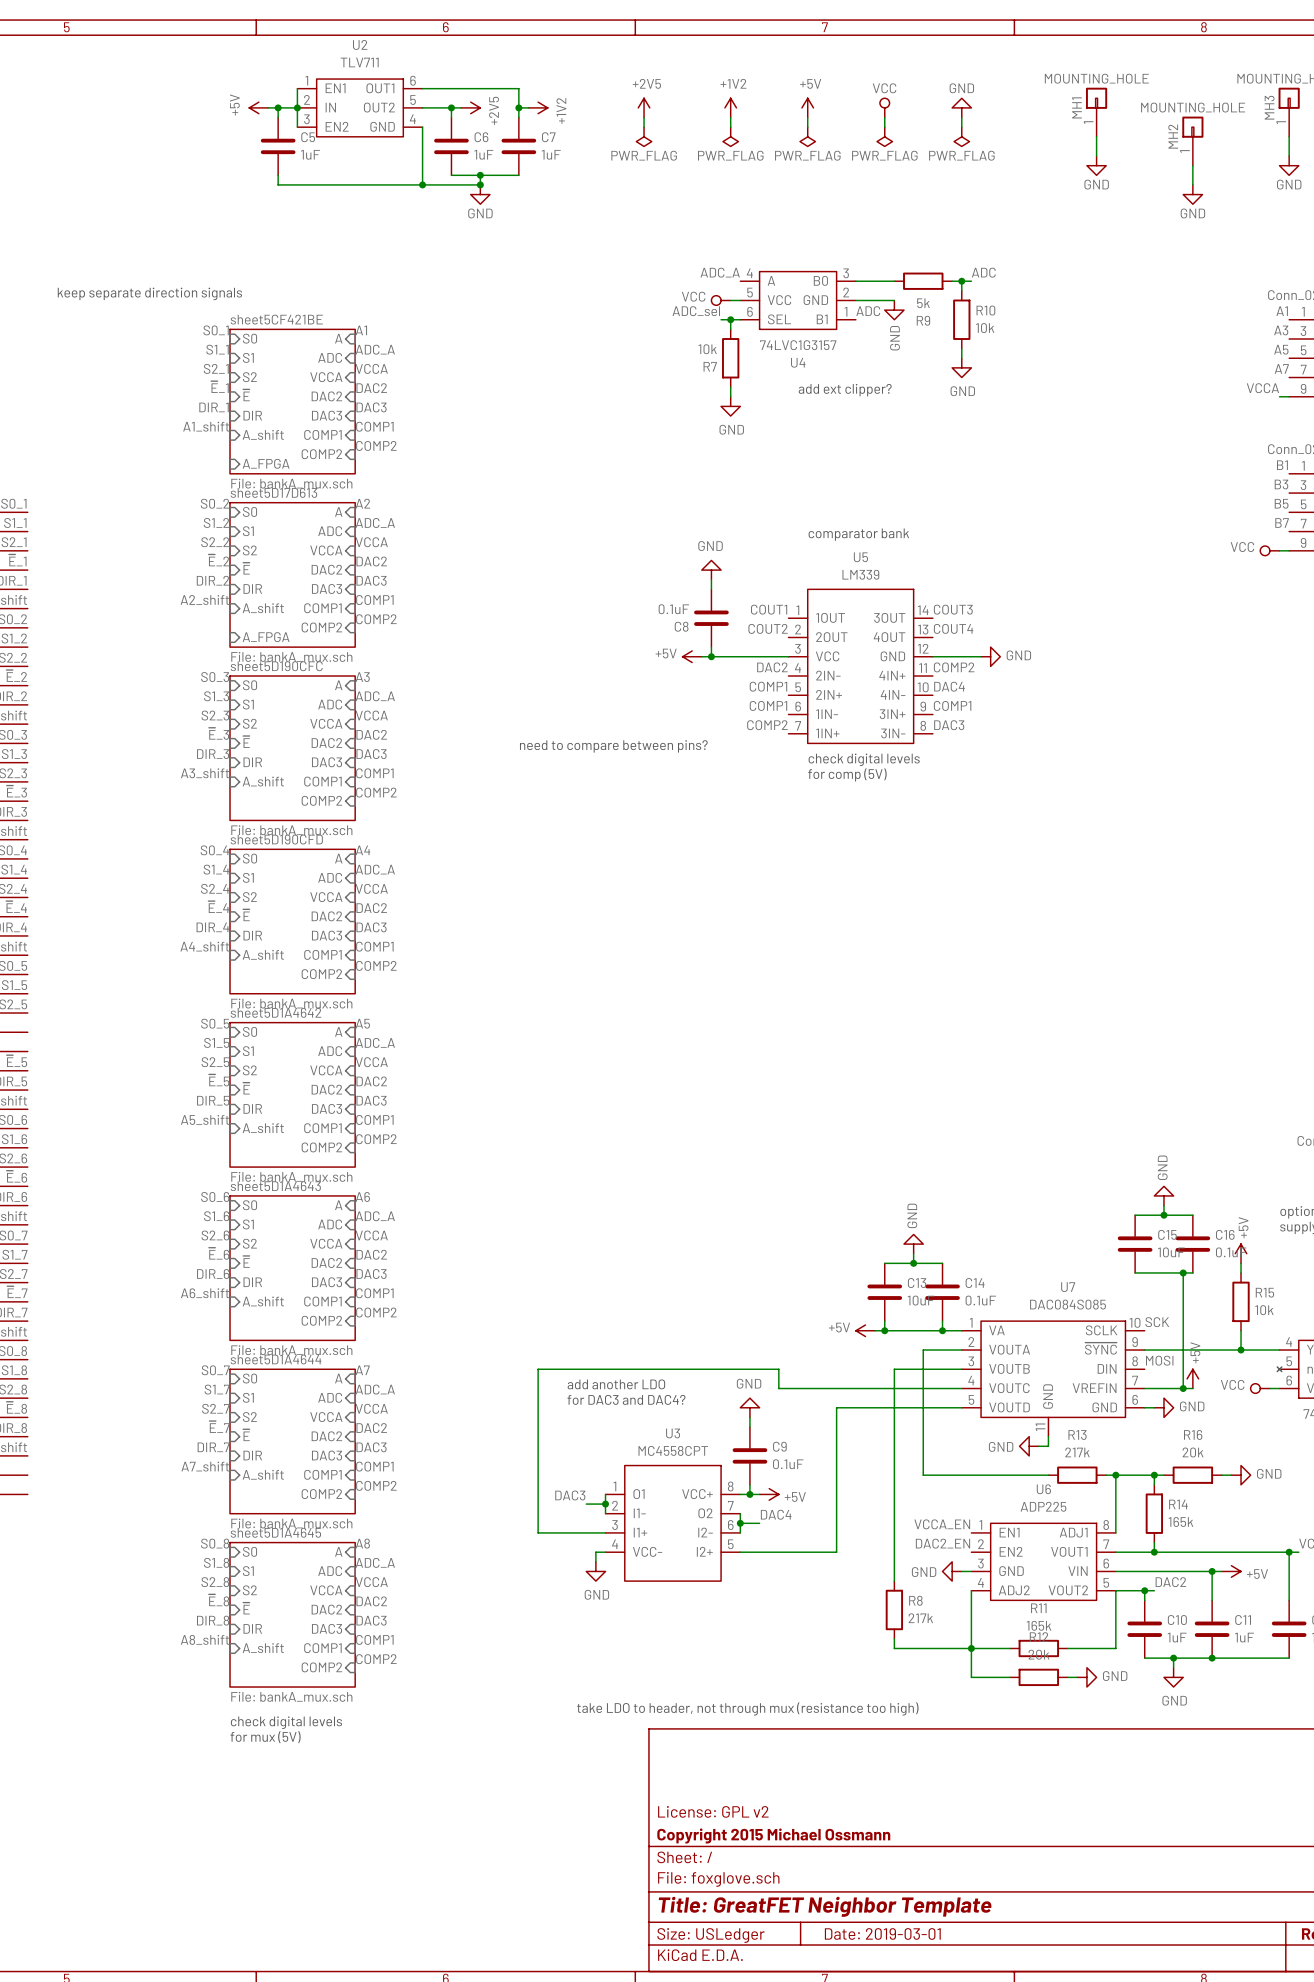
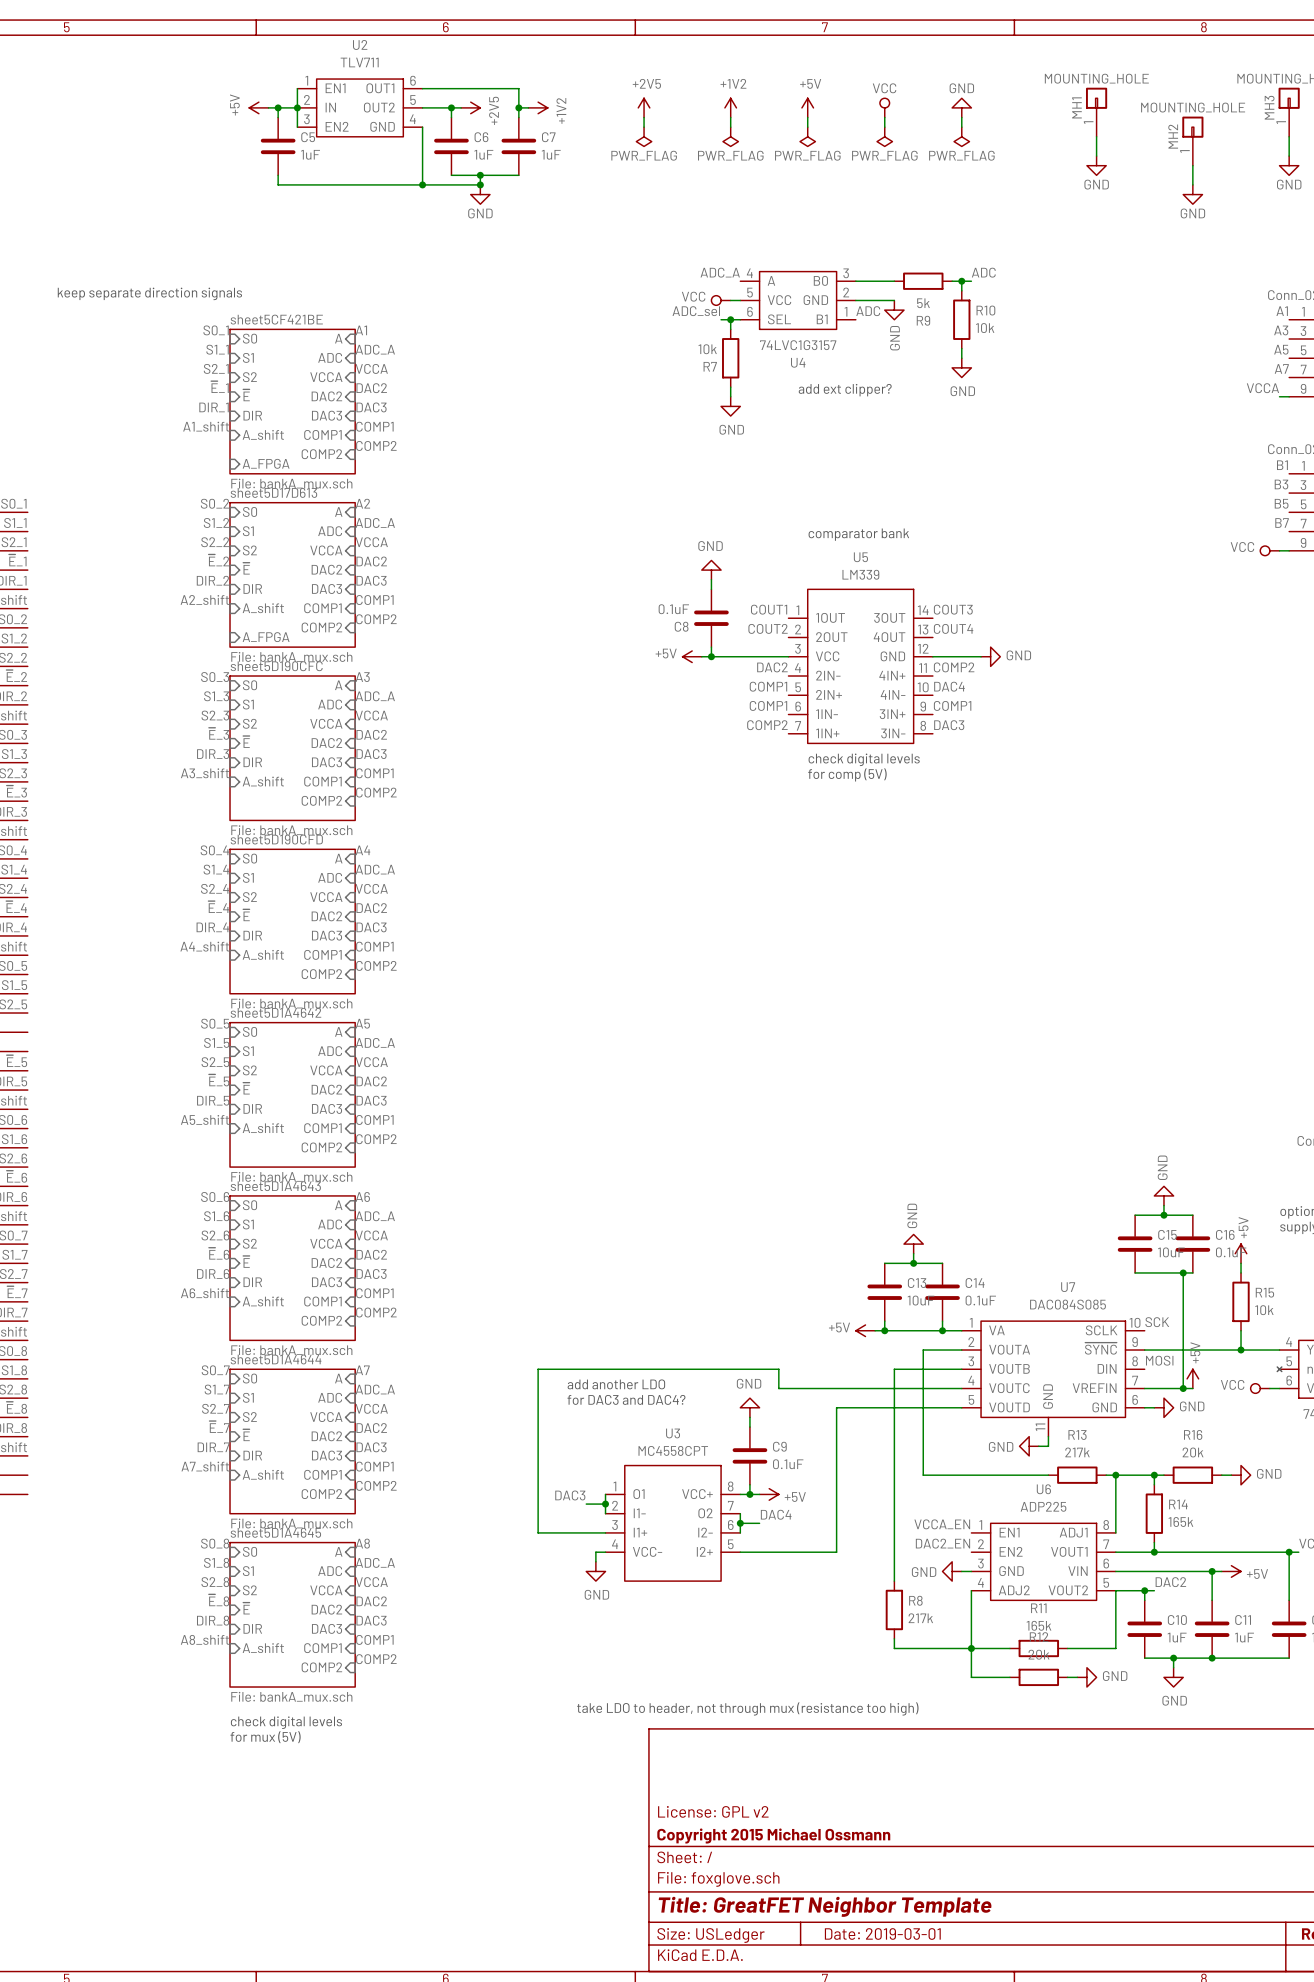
text: need to compare between pins? (613, 746) -> none

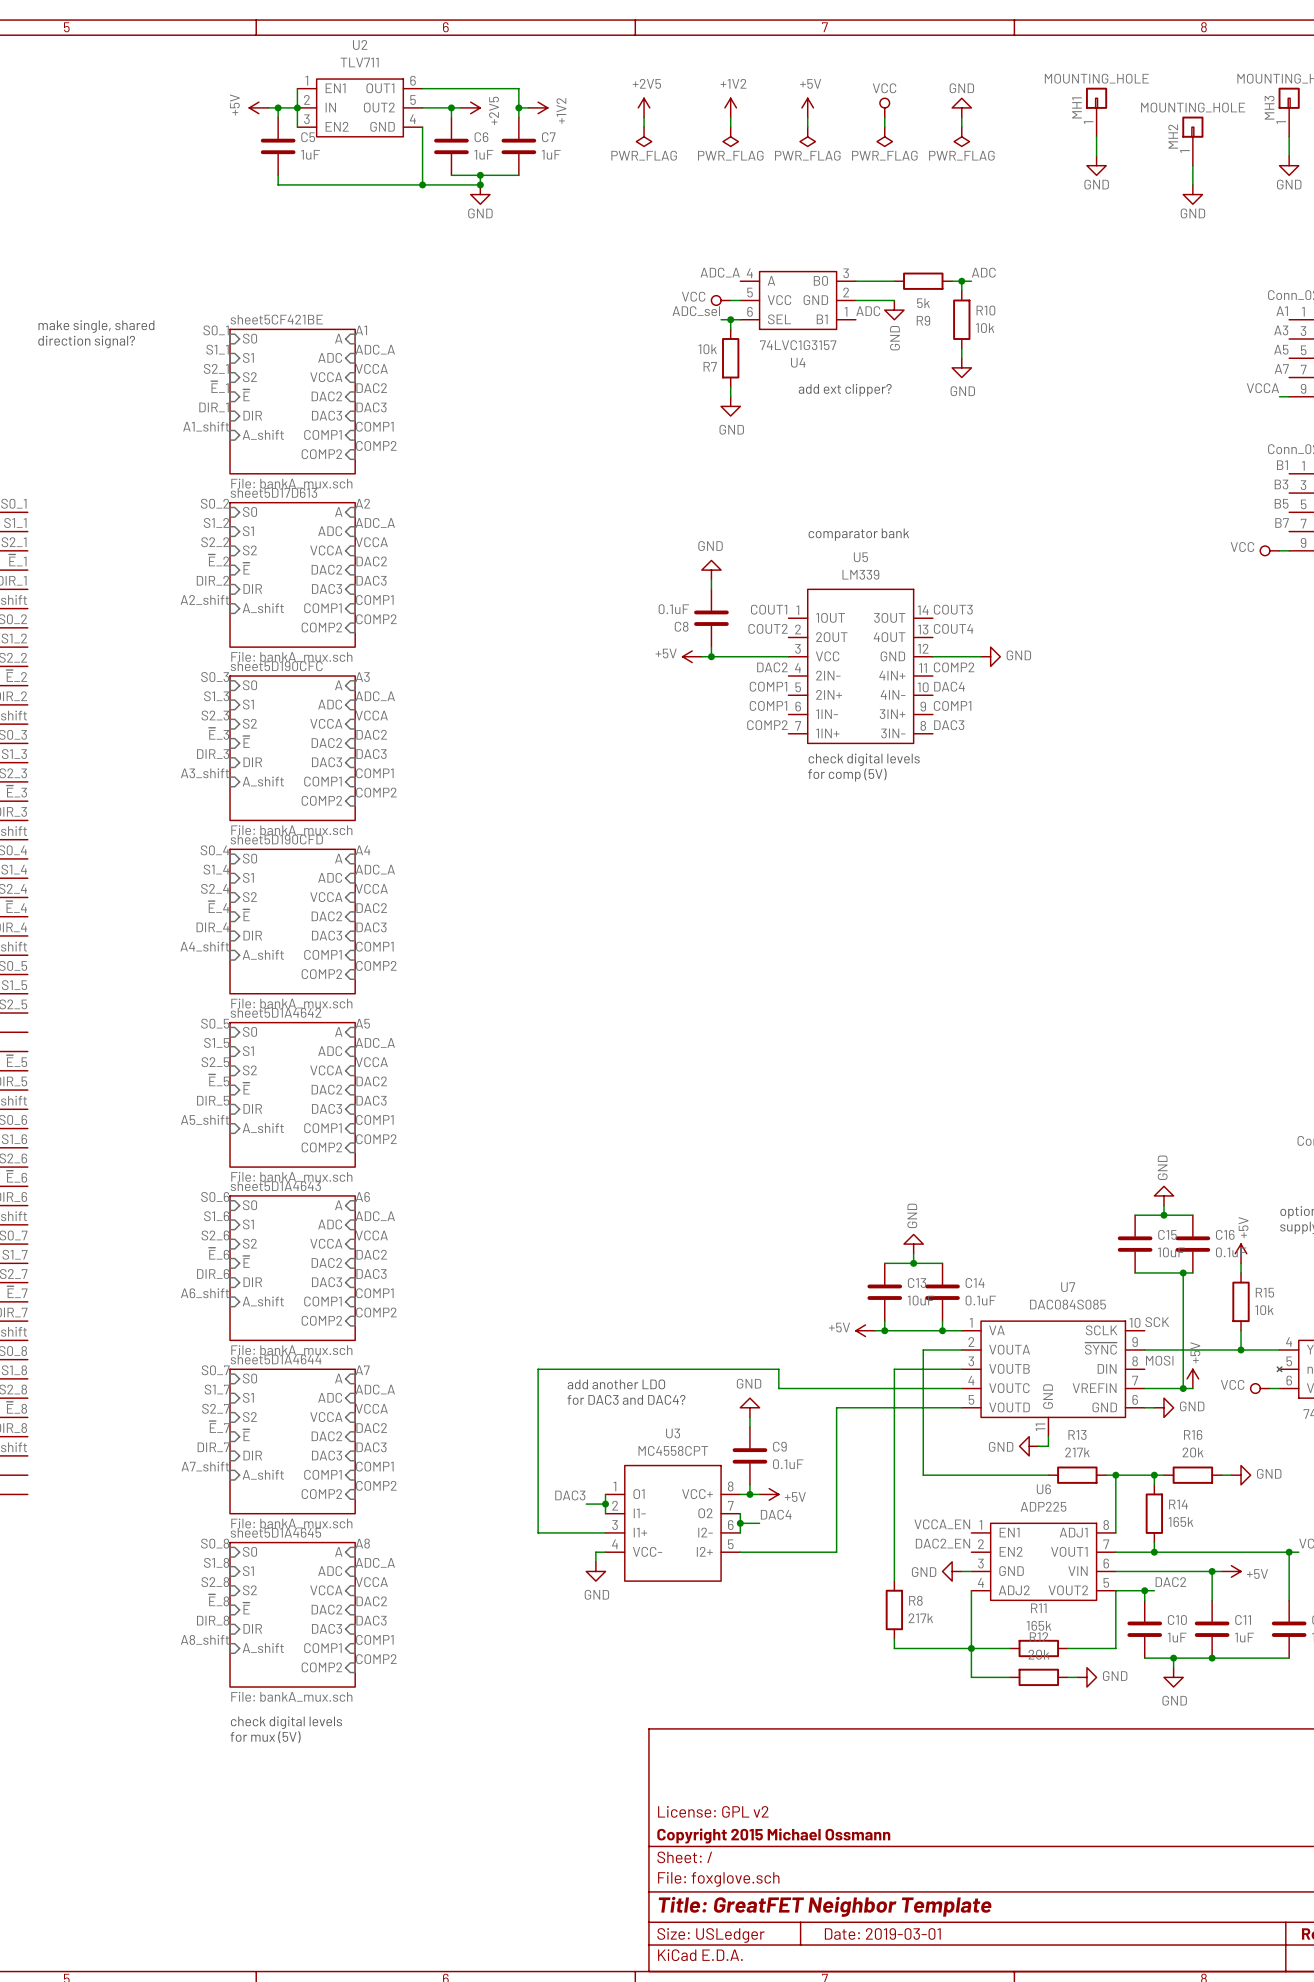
text: keep separate direction signals (149, 293) -> none
text: none -> make single, shared (96, 326)
text: none -> direction signal? (86, 342)
sheet pin: A_FPGA (266, 463) -> none
sheet pin: A_FPGA (266, 637) -> none
text: take LDO to header, not through mux (resistance too high) (747, 1708) -> none

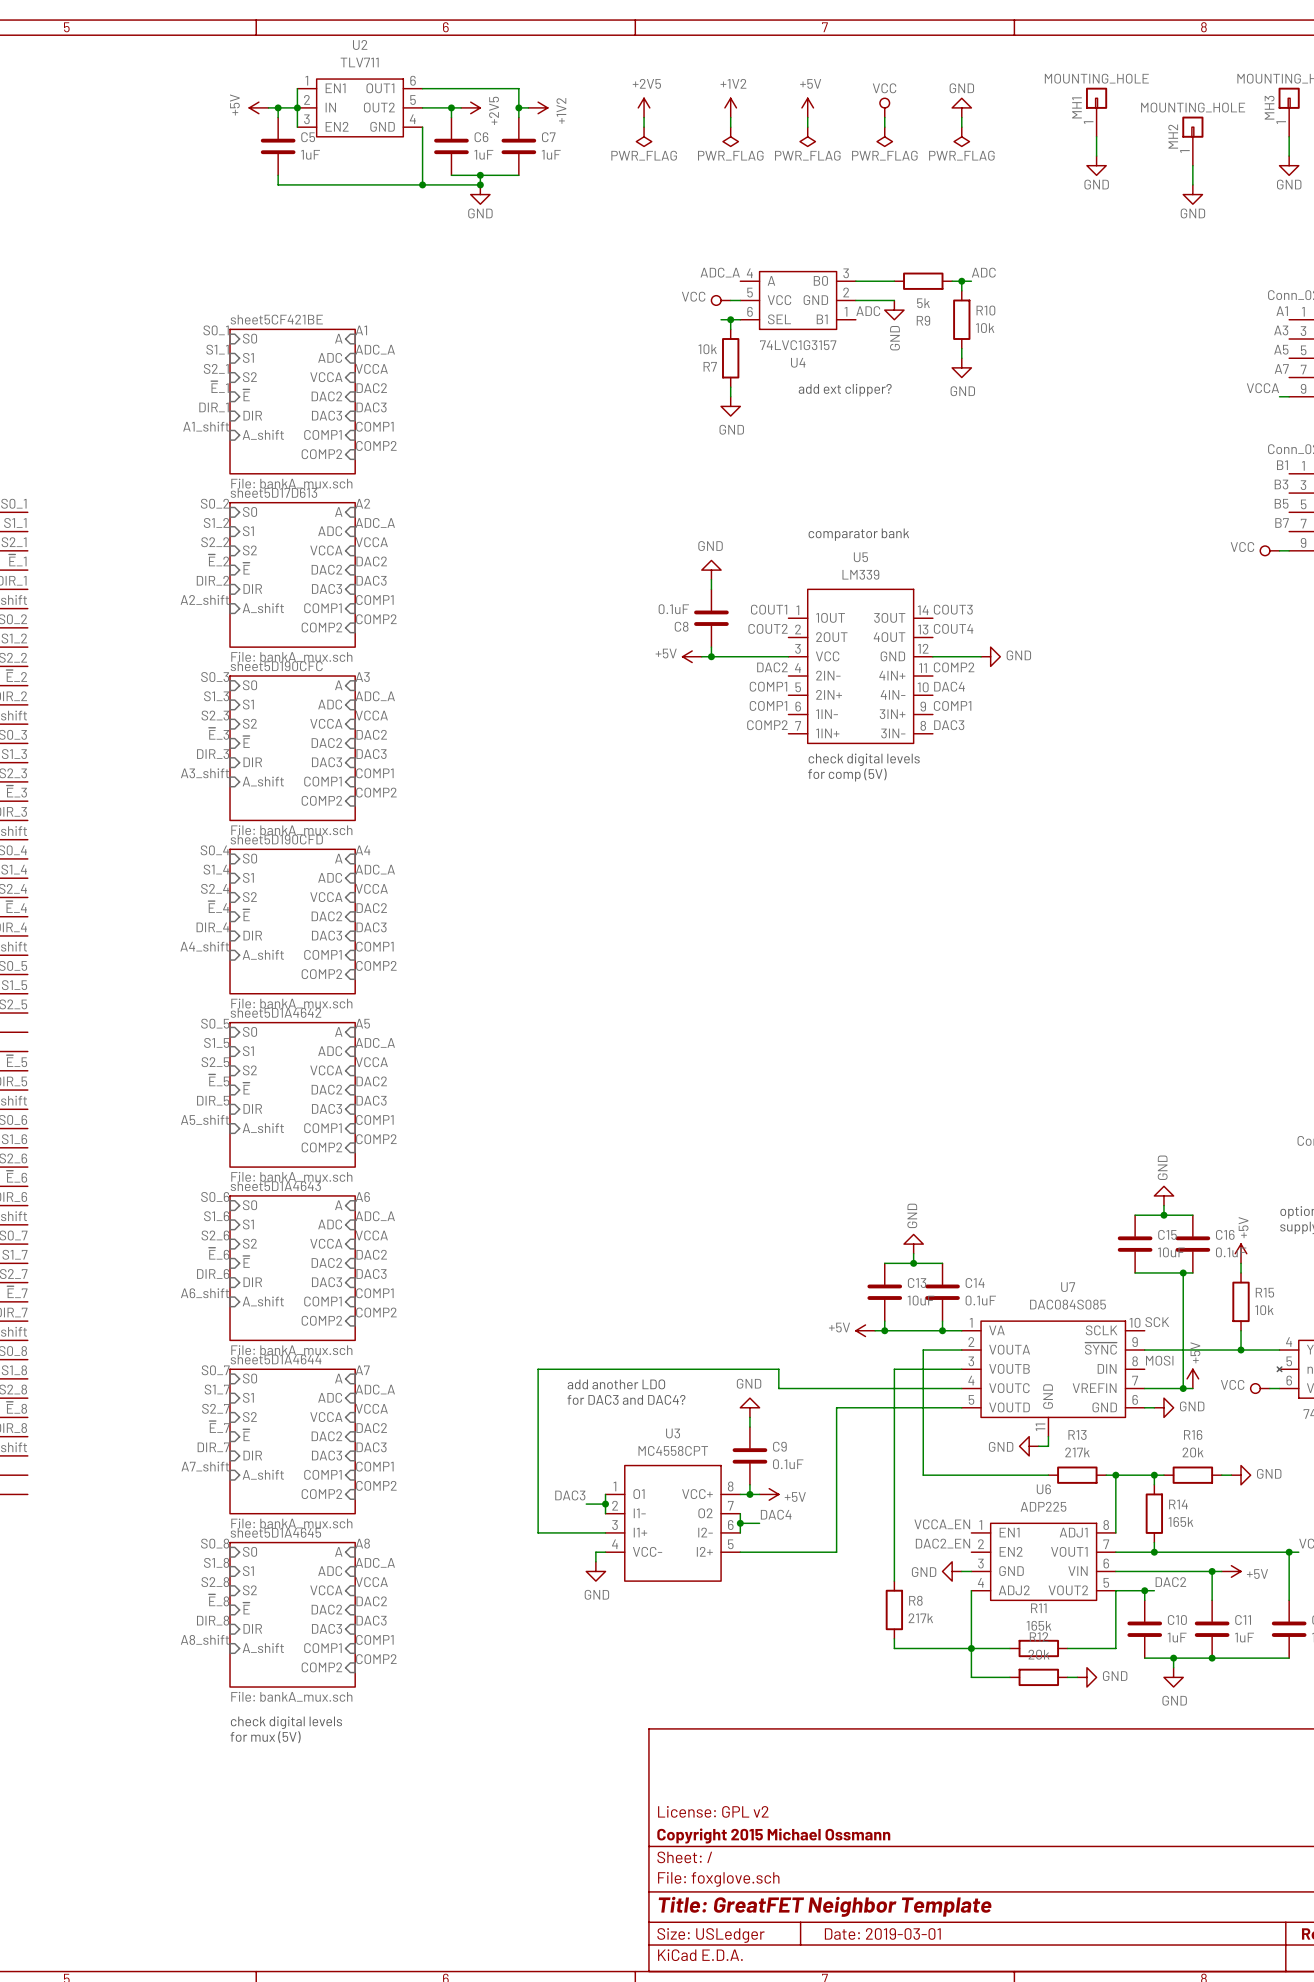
label: ADC_sel (696, 311) -> none
text: make single, shared (96, 326) -> none
text: direction signal? (86, 342) -> none

